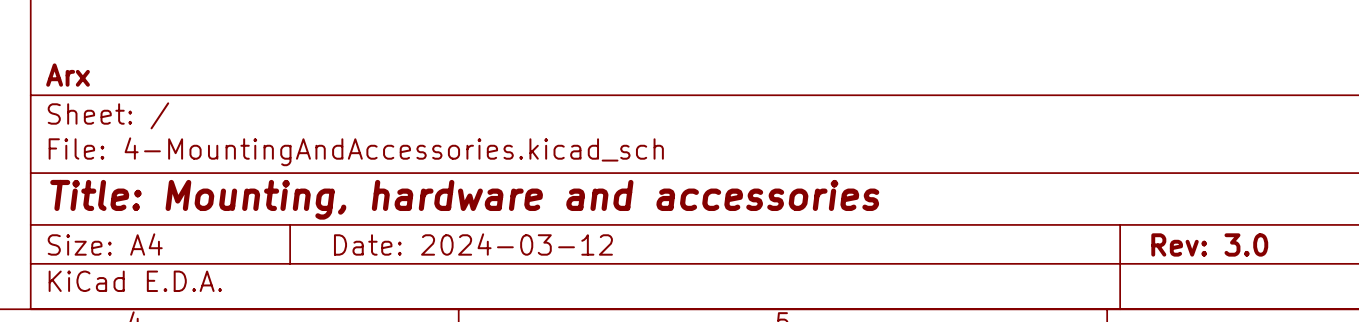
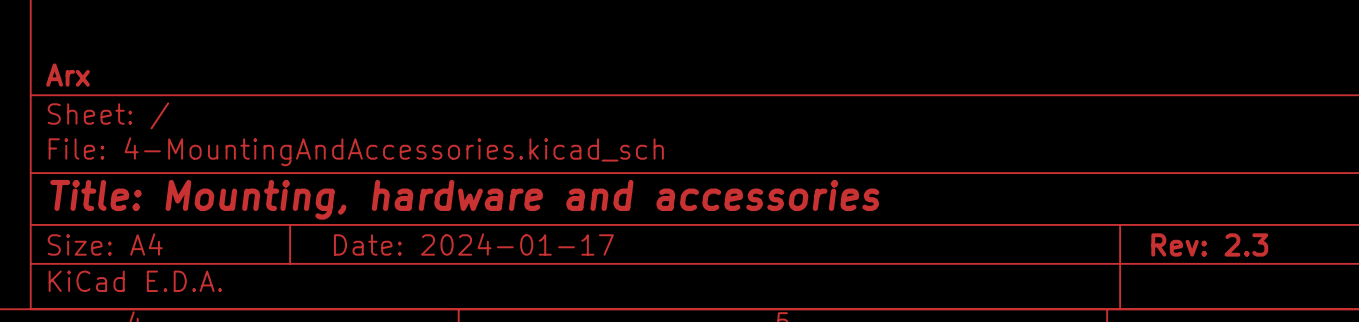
title block: Date: 2024-03-12 (473, 244) -> Date: 2024-01-17 (473, 244)
title block: Rev: 3.0 (1209, 244) -> Rev: 2.3 (1209, 244)

